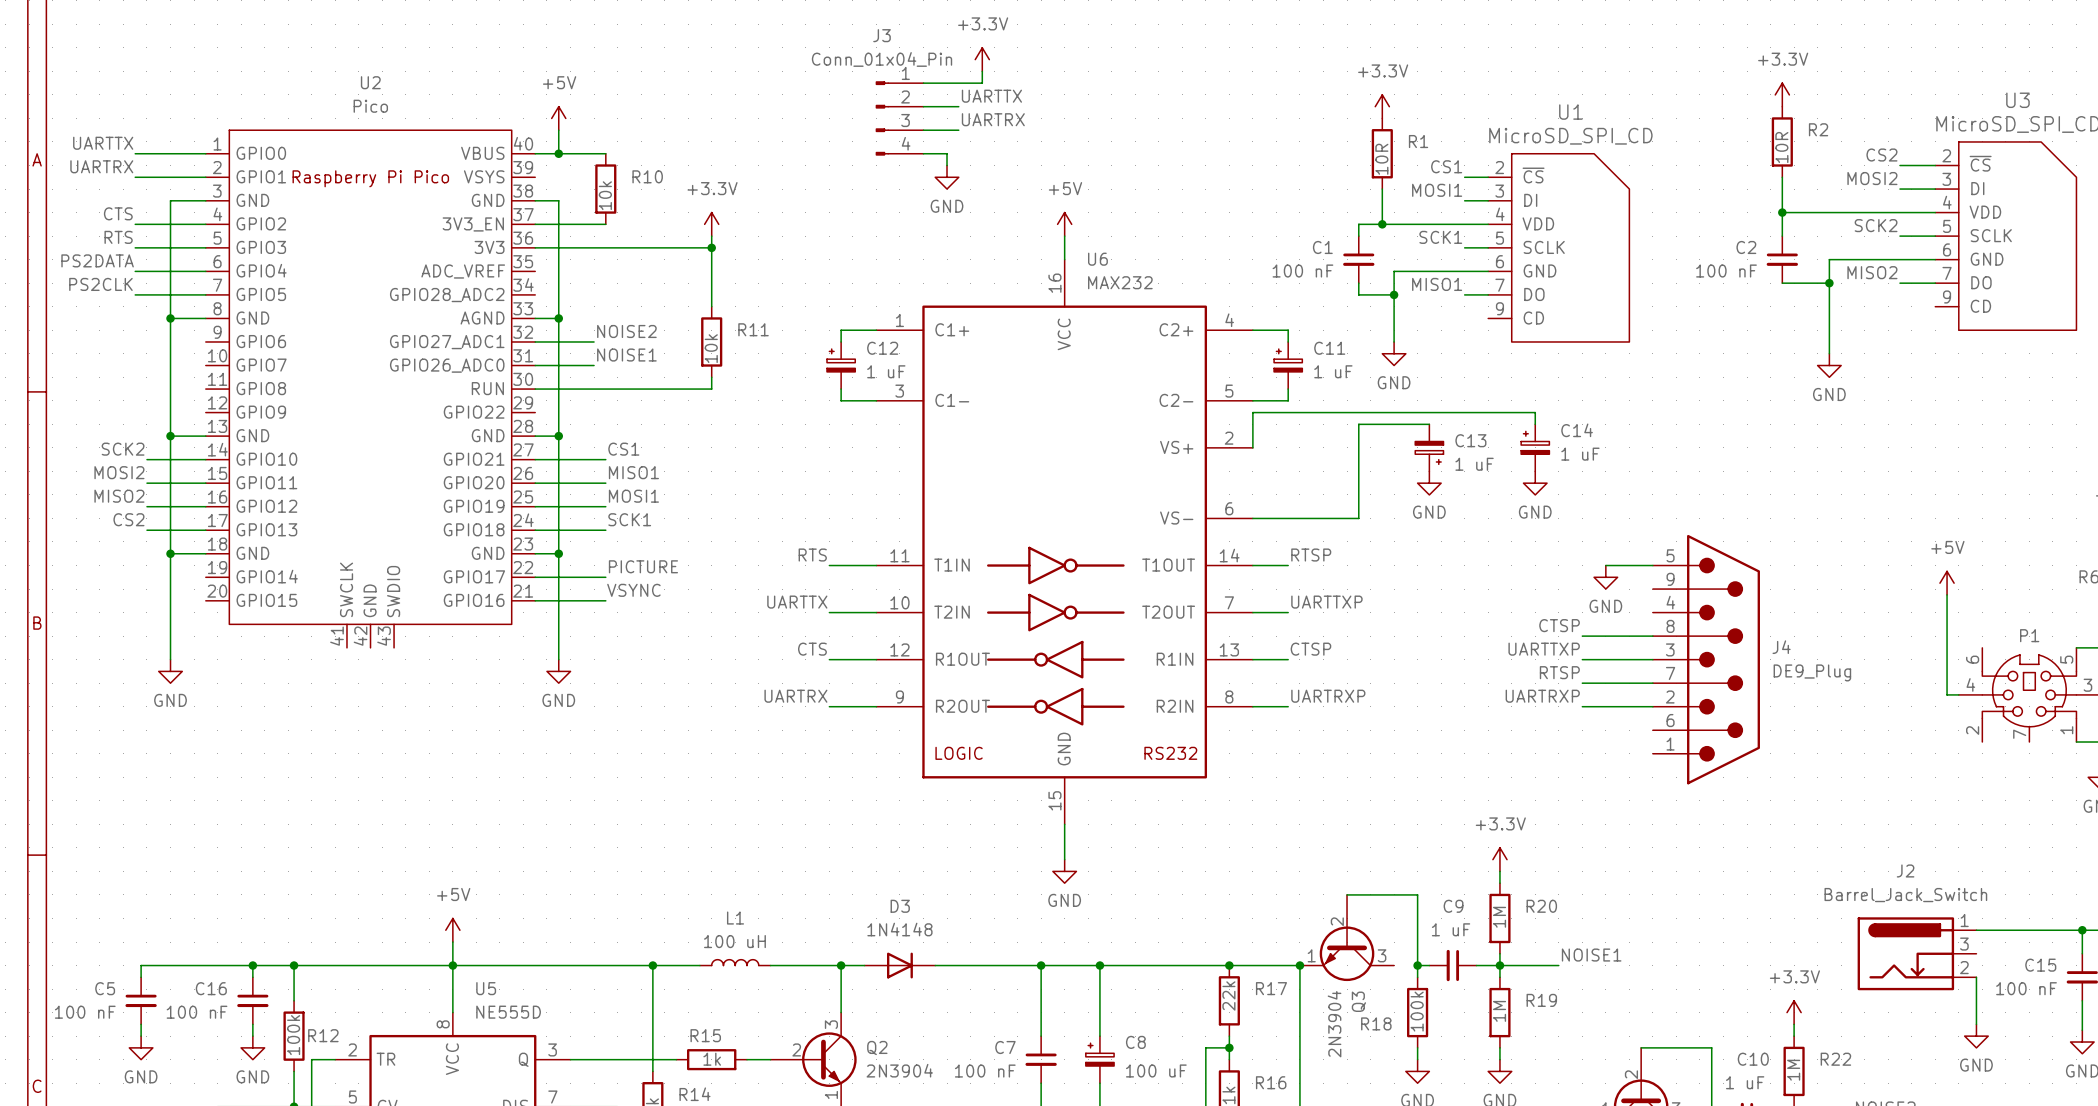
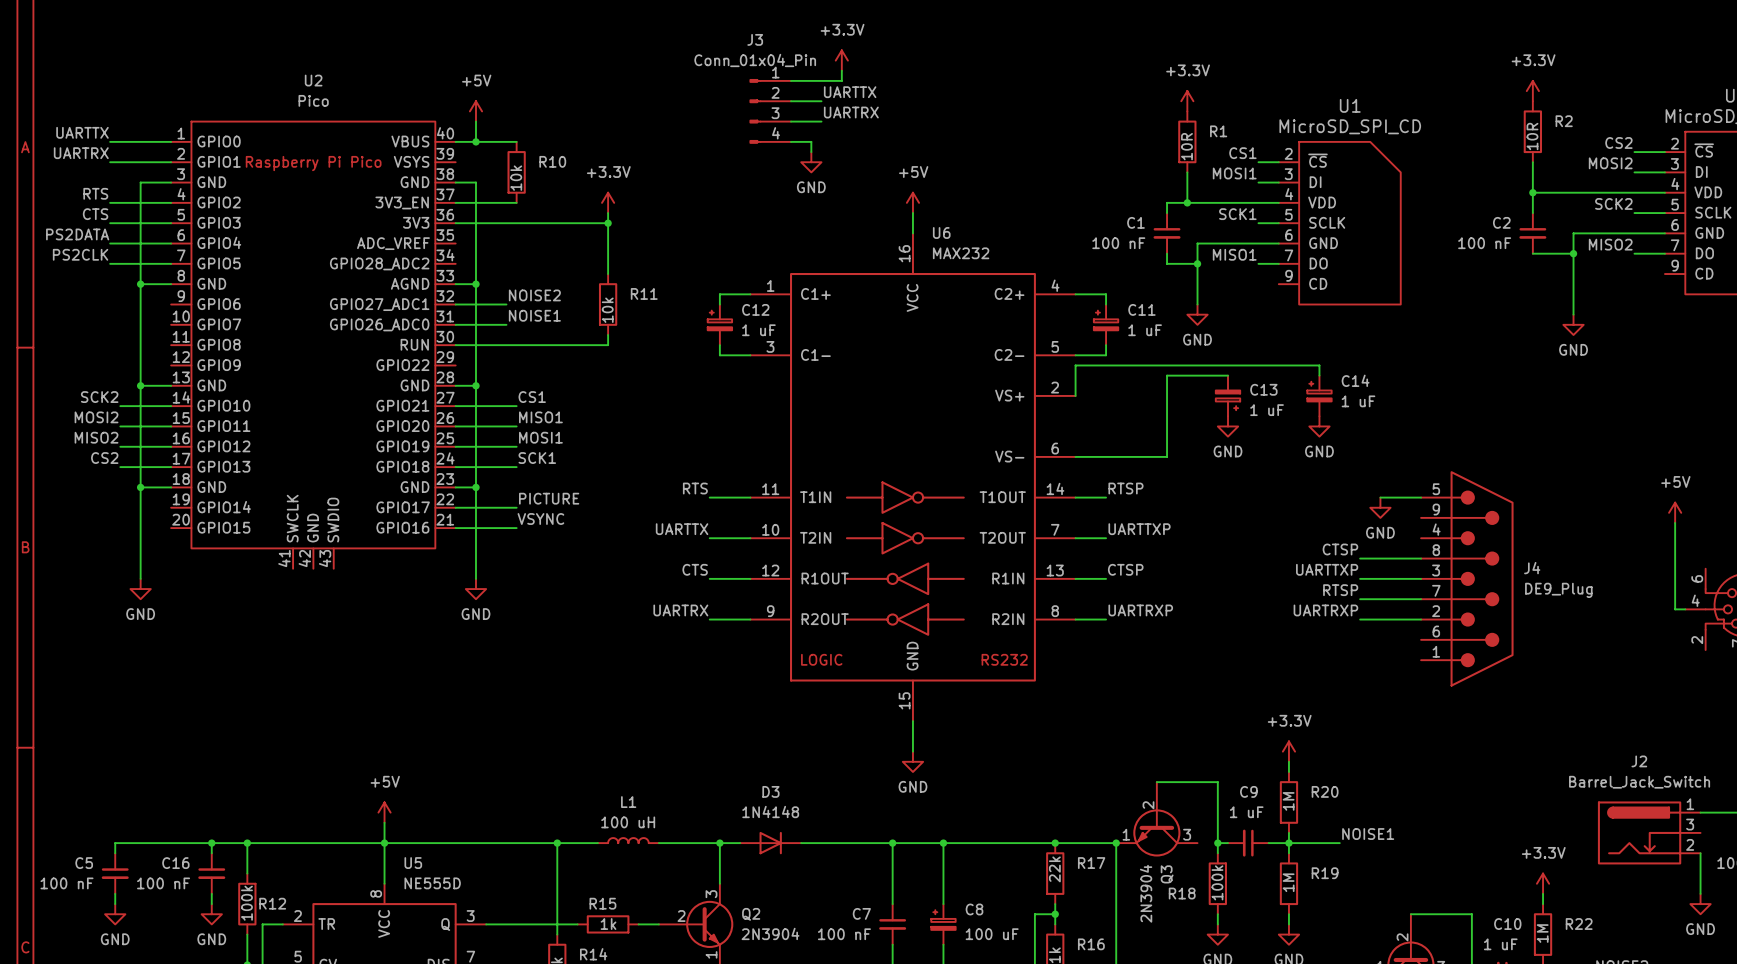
label: CTS (118, 213) -> RTS (95, 193)
label: RTS (118, 237) -> CTS (95, 214)

